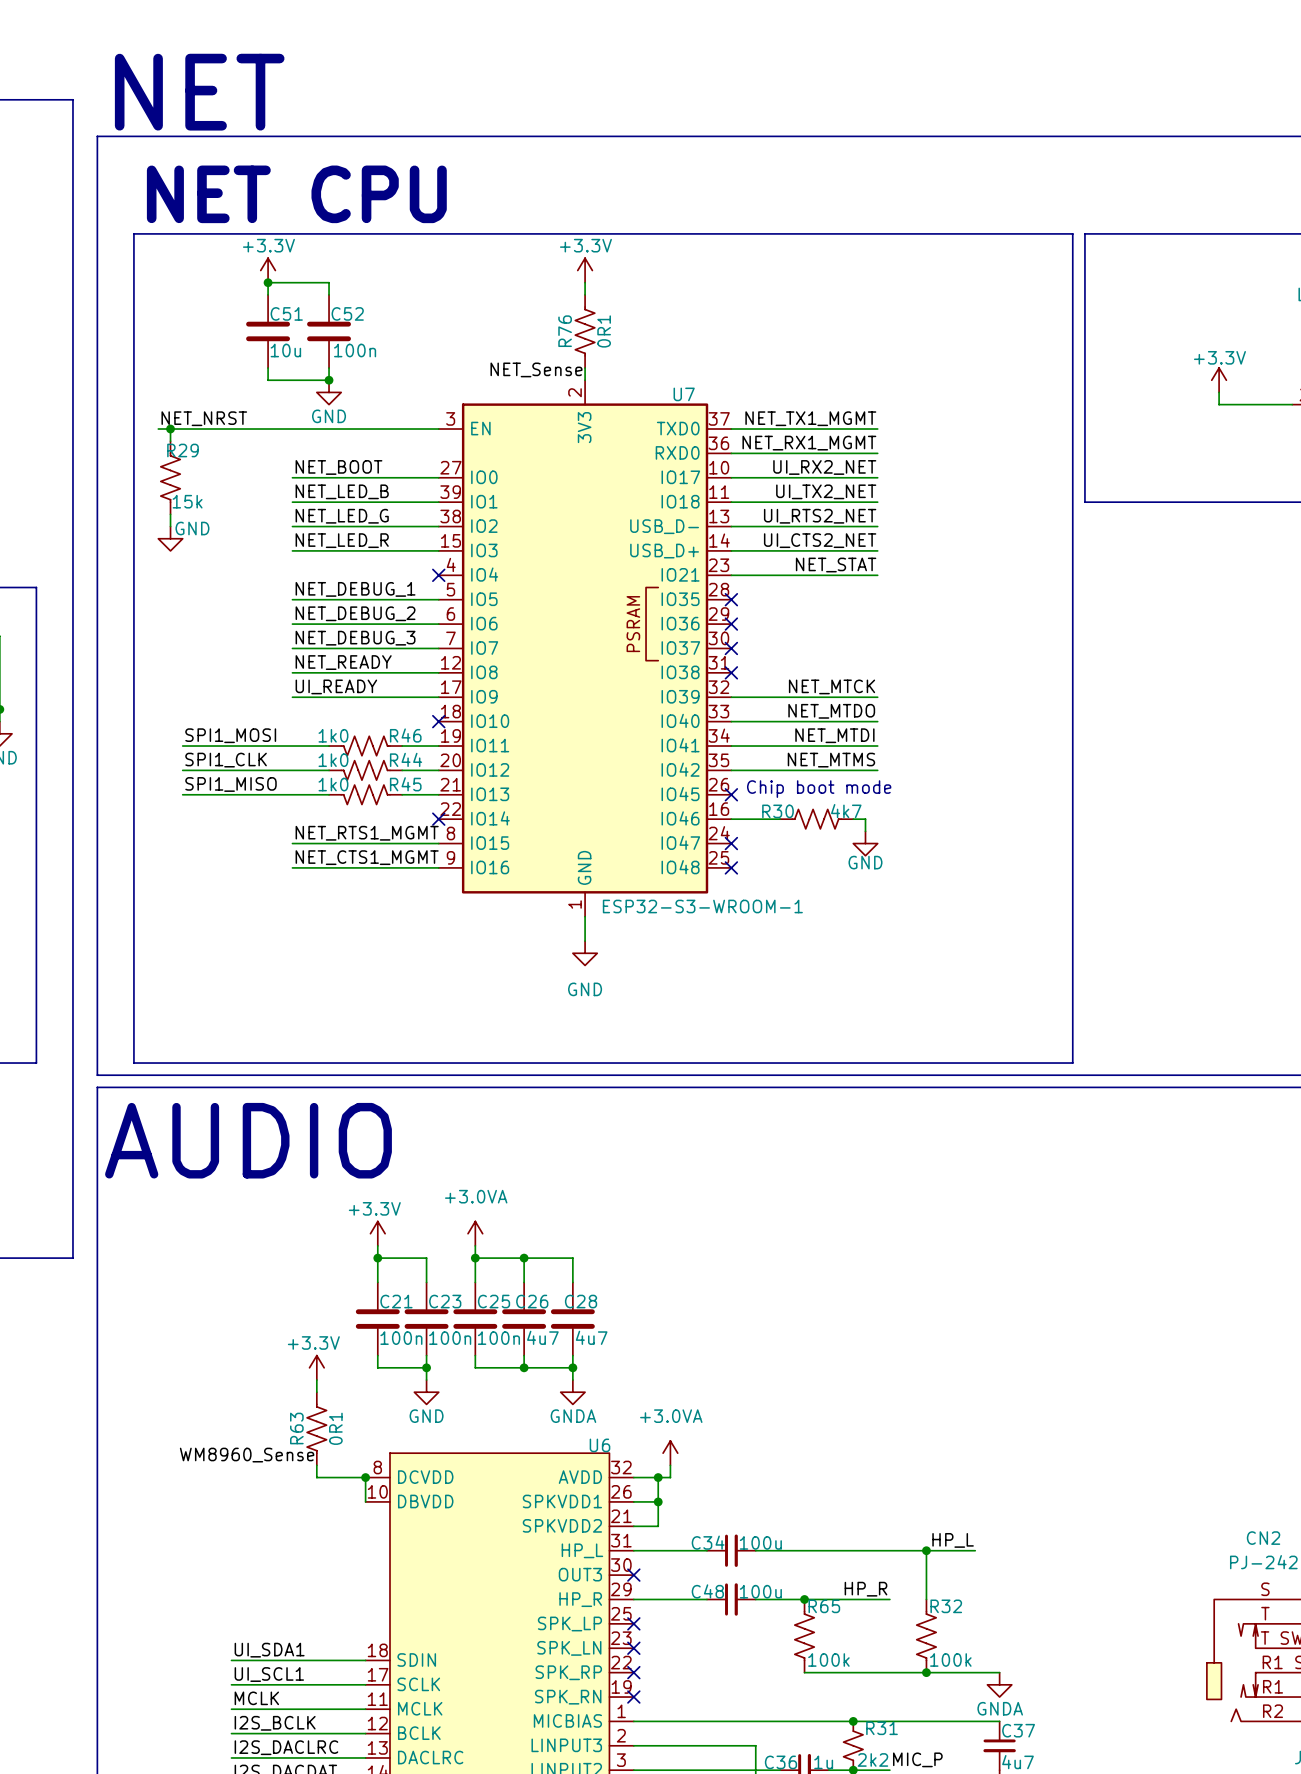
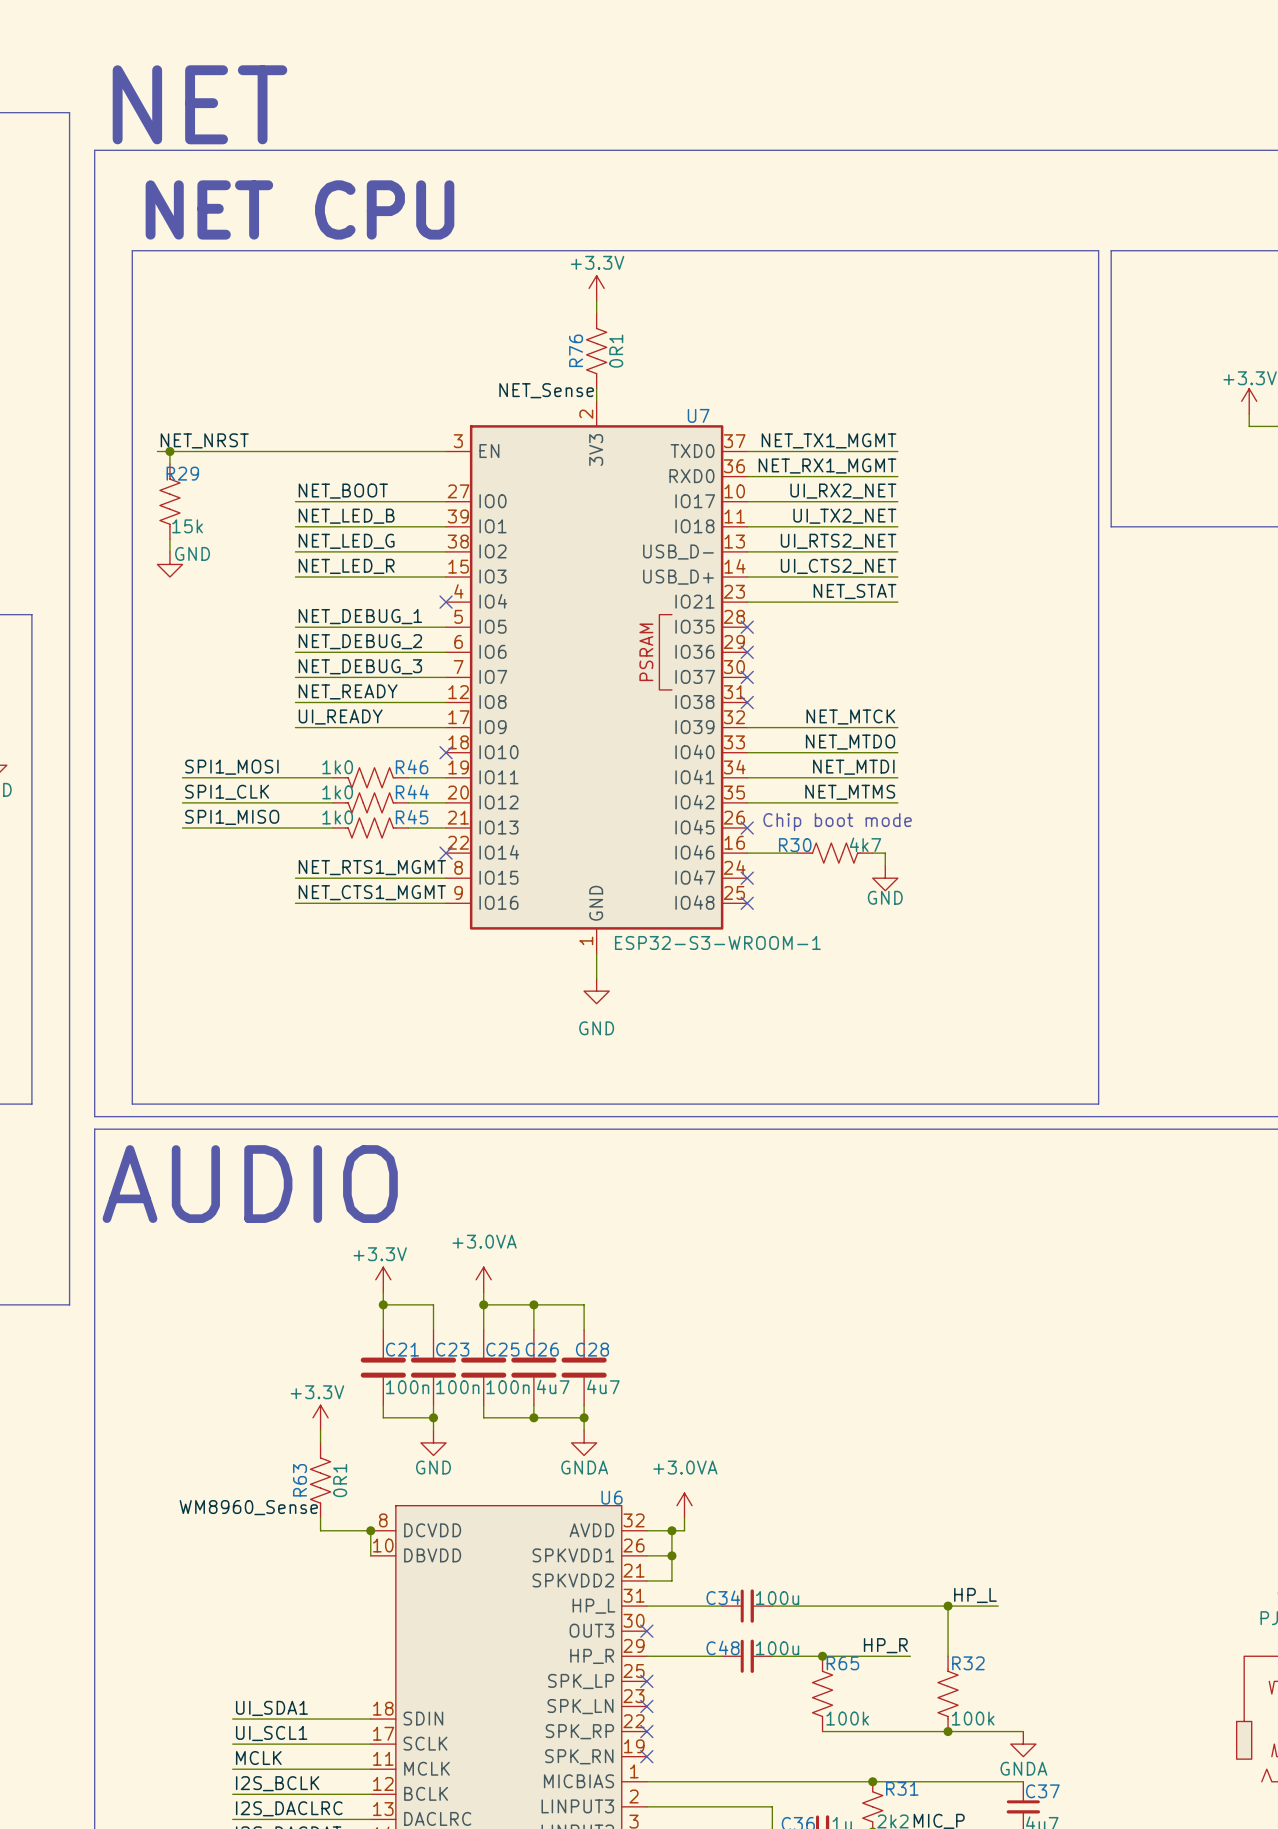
power symbol: +3.3V (268, 270) -> none
junction: (268, 282) -> none
wire: (268, 294) (268, 282) (329, 282) (329, 294) -> none
C51: 10u (268, 331) -> none
C52: 100n (329, 331) -> none
wire: (268, 368) (268, 380) (329, 380) (329, 368) -> none
junction: (329, 380) -> none
power symbol: GND (329, 392) -> none

